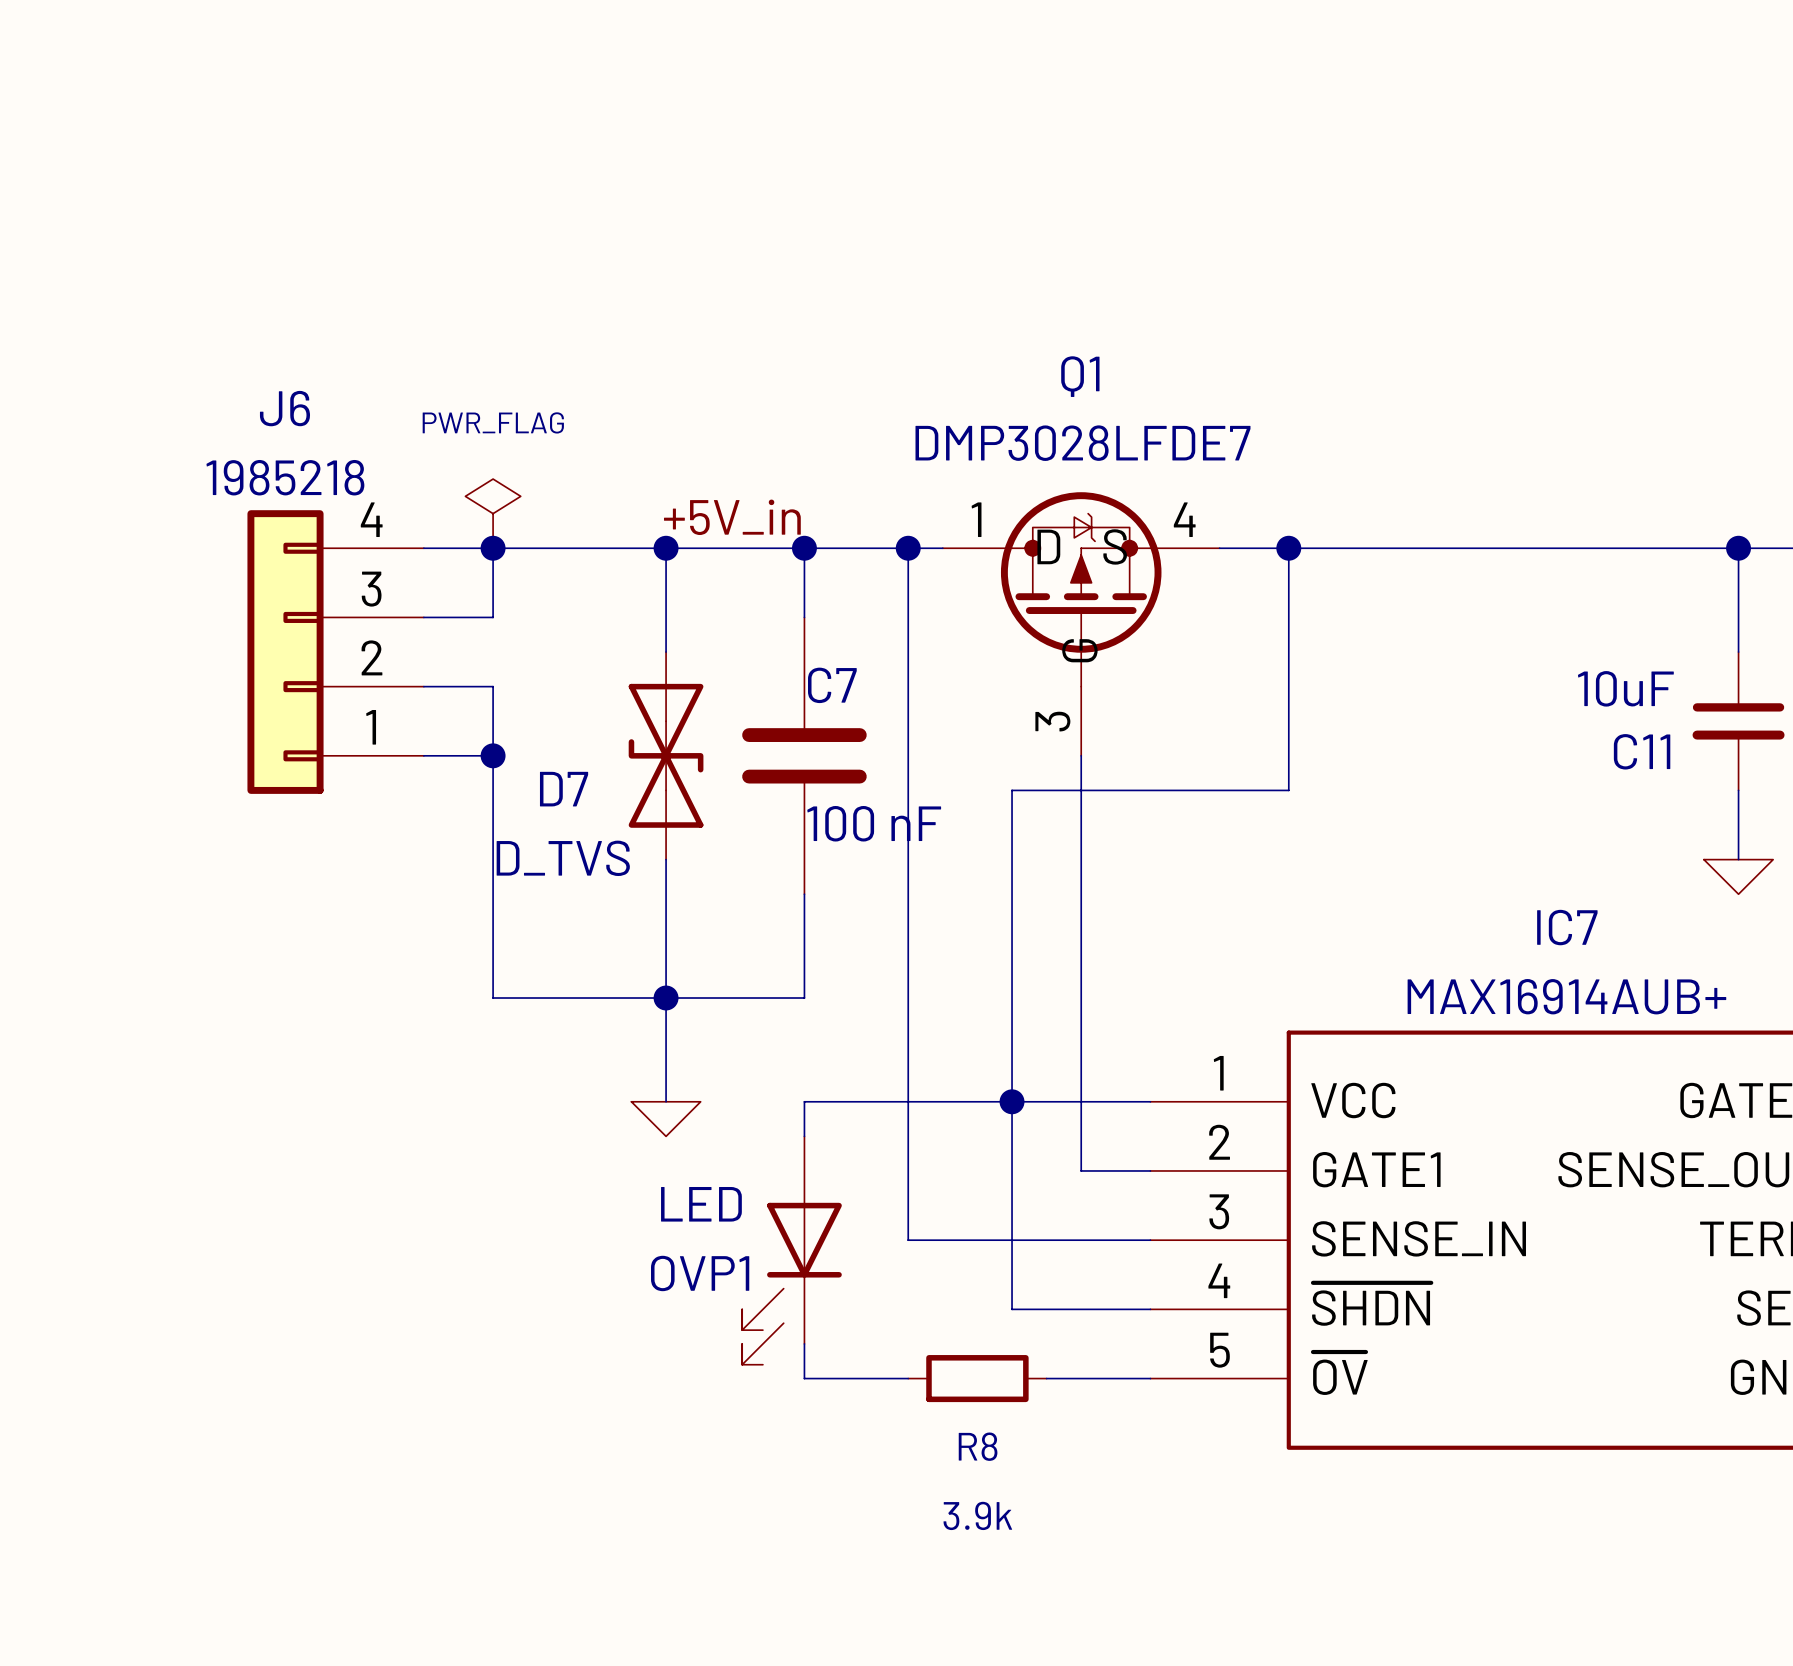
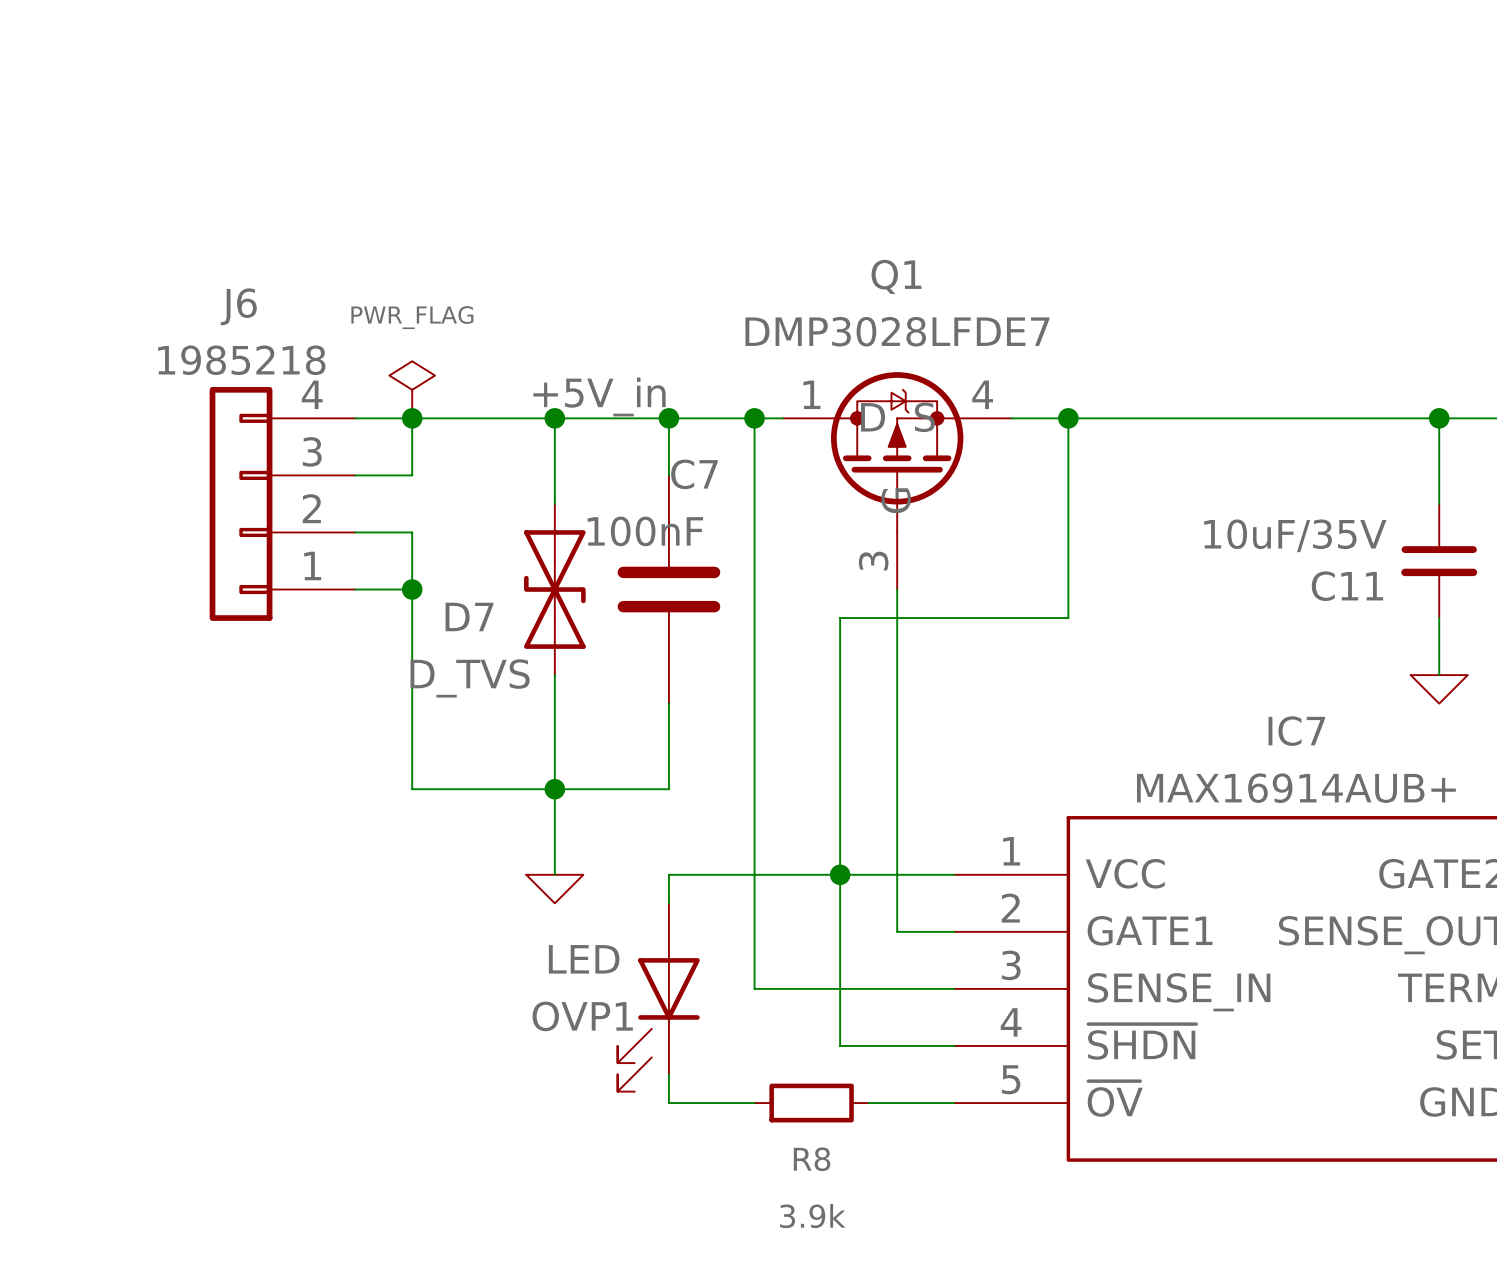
C7 name position: C7 (832, 685) -> C7 (694, 474)
C11 value: 10uF (1625, 688) -> 10uF/35V (1295, 535)
C7 value: 100 nF (874, 823) -> 100nF (645, 531)

